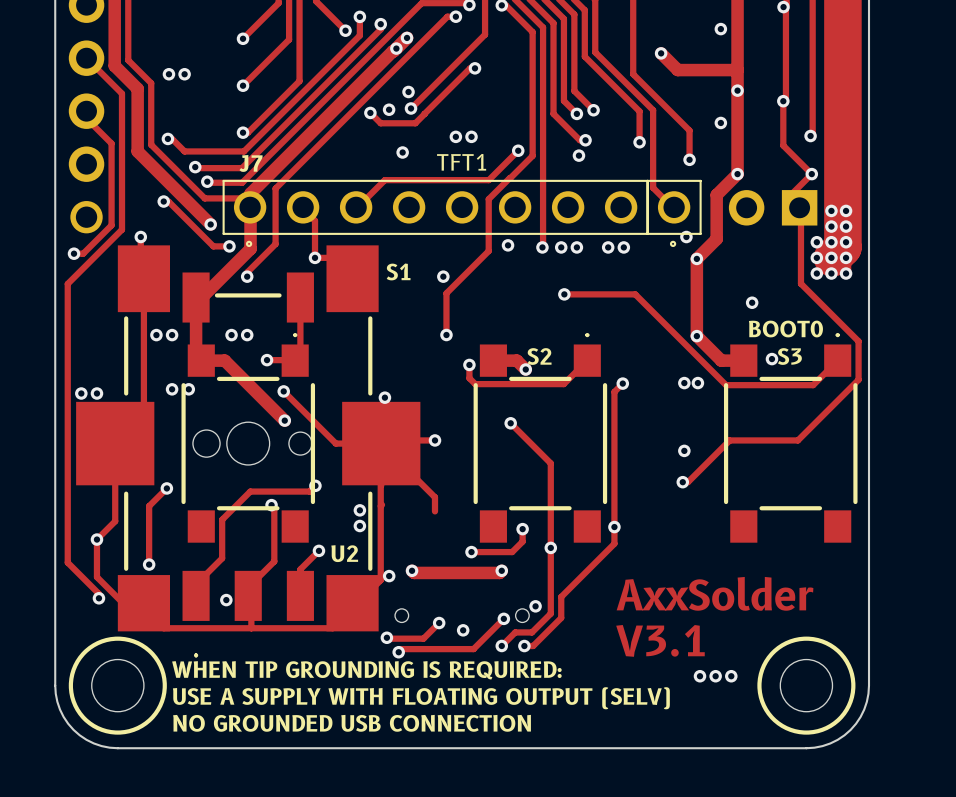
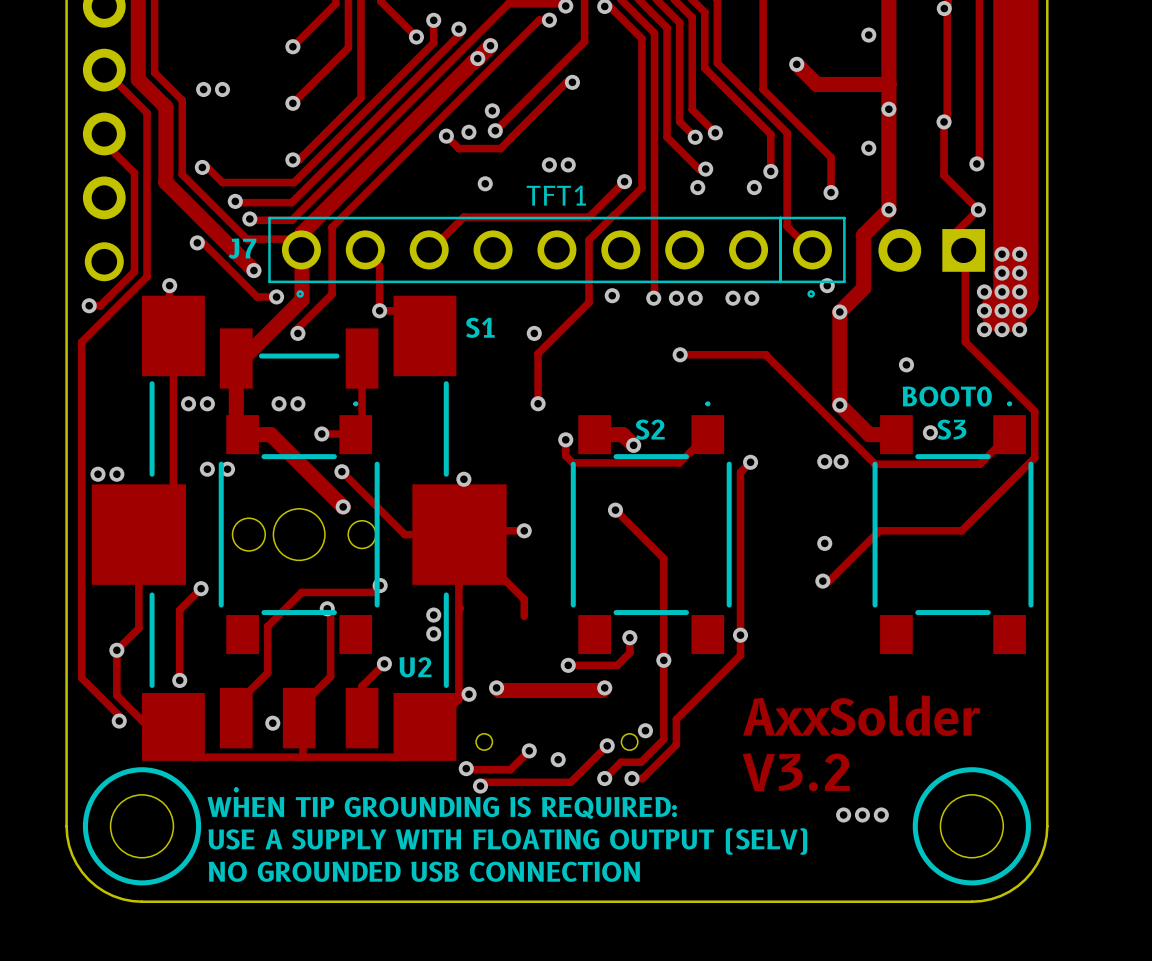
via: none -> (754, 187)
J7 name position: J7 (251, 163) -> J7 (242, 248)
text: V3.1 (660, 640) -> V3.2 (796, 772)

